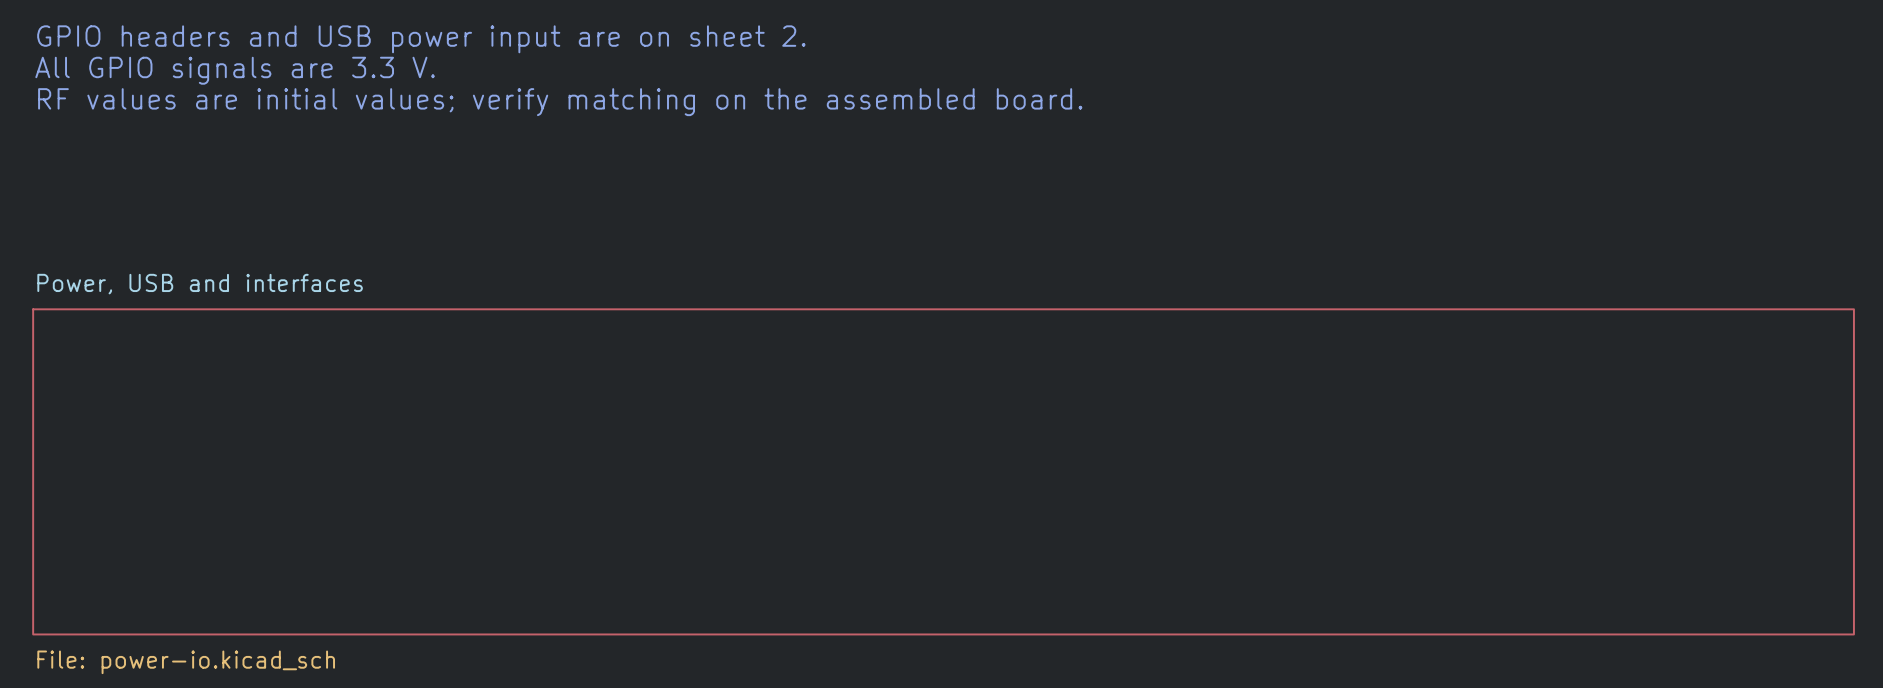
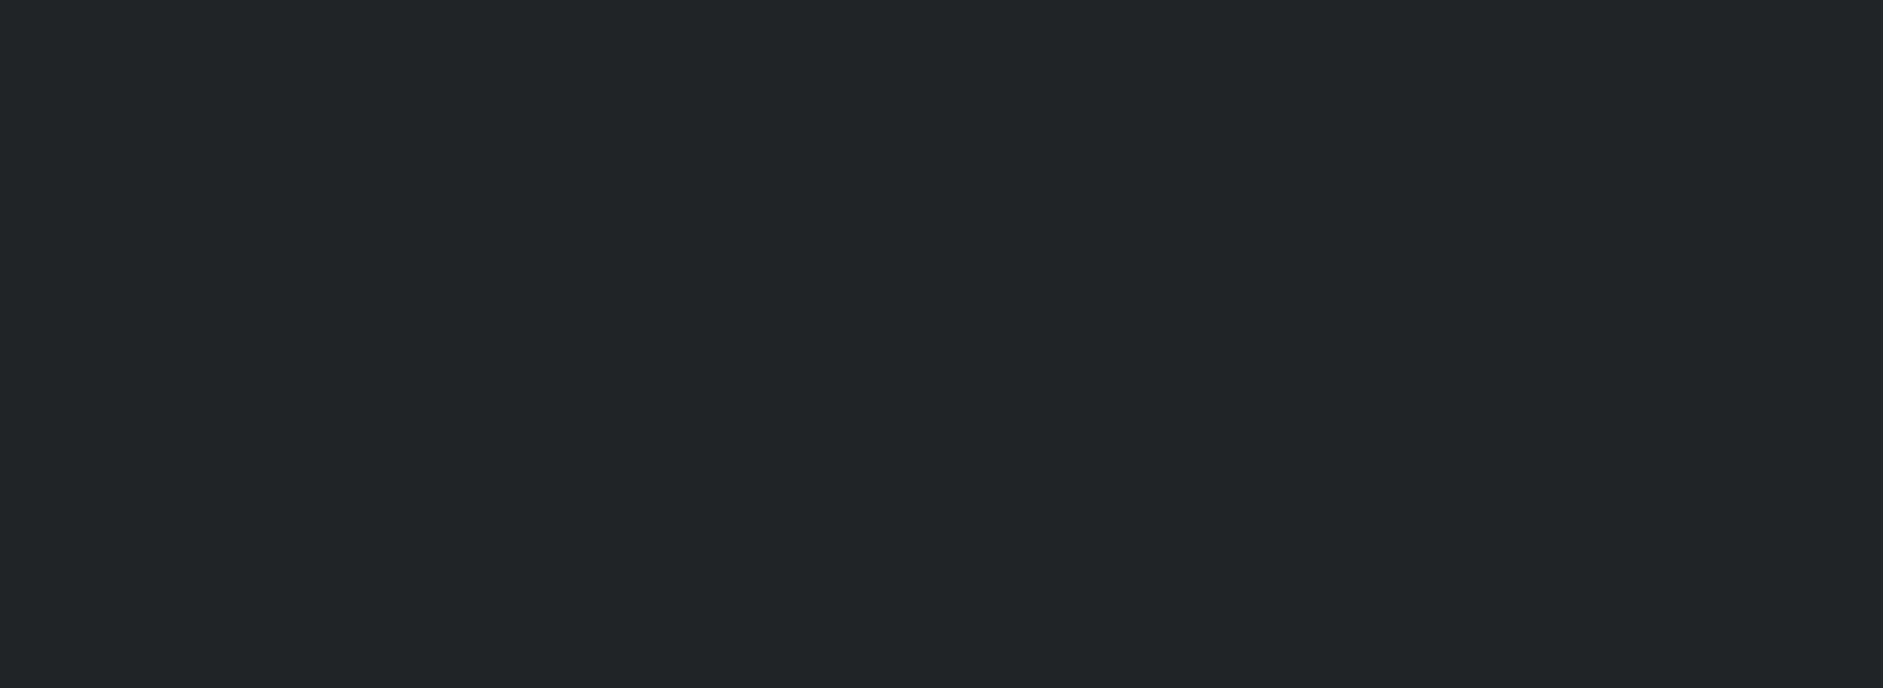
text: GPIO headers and USB power input are on sheet 2. (421, 39) -> none
text: All GPIO signals are 3.3 V. (235, 70) -> none
text: RF values are initial values; verify matching on the assembled board. (560, 102) -> none
sheet Power, USB and interfaces: File: power-io.kicad_sch (943, 471) -> none

